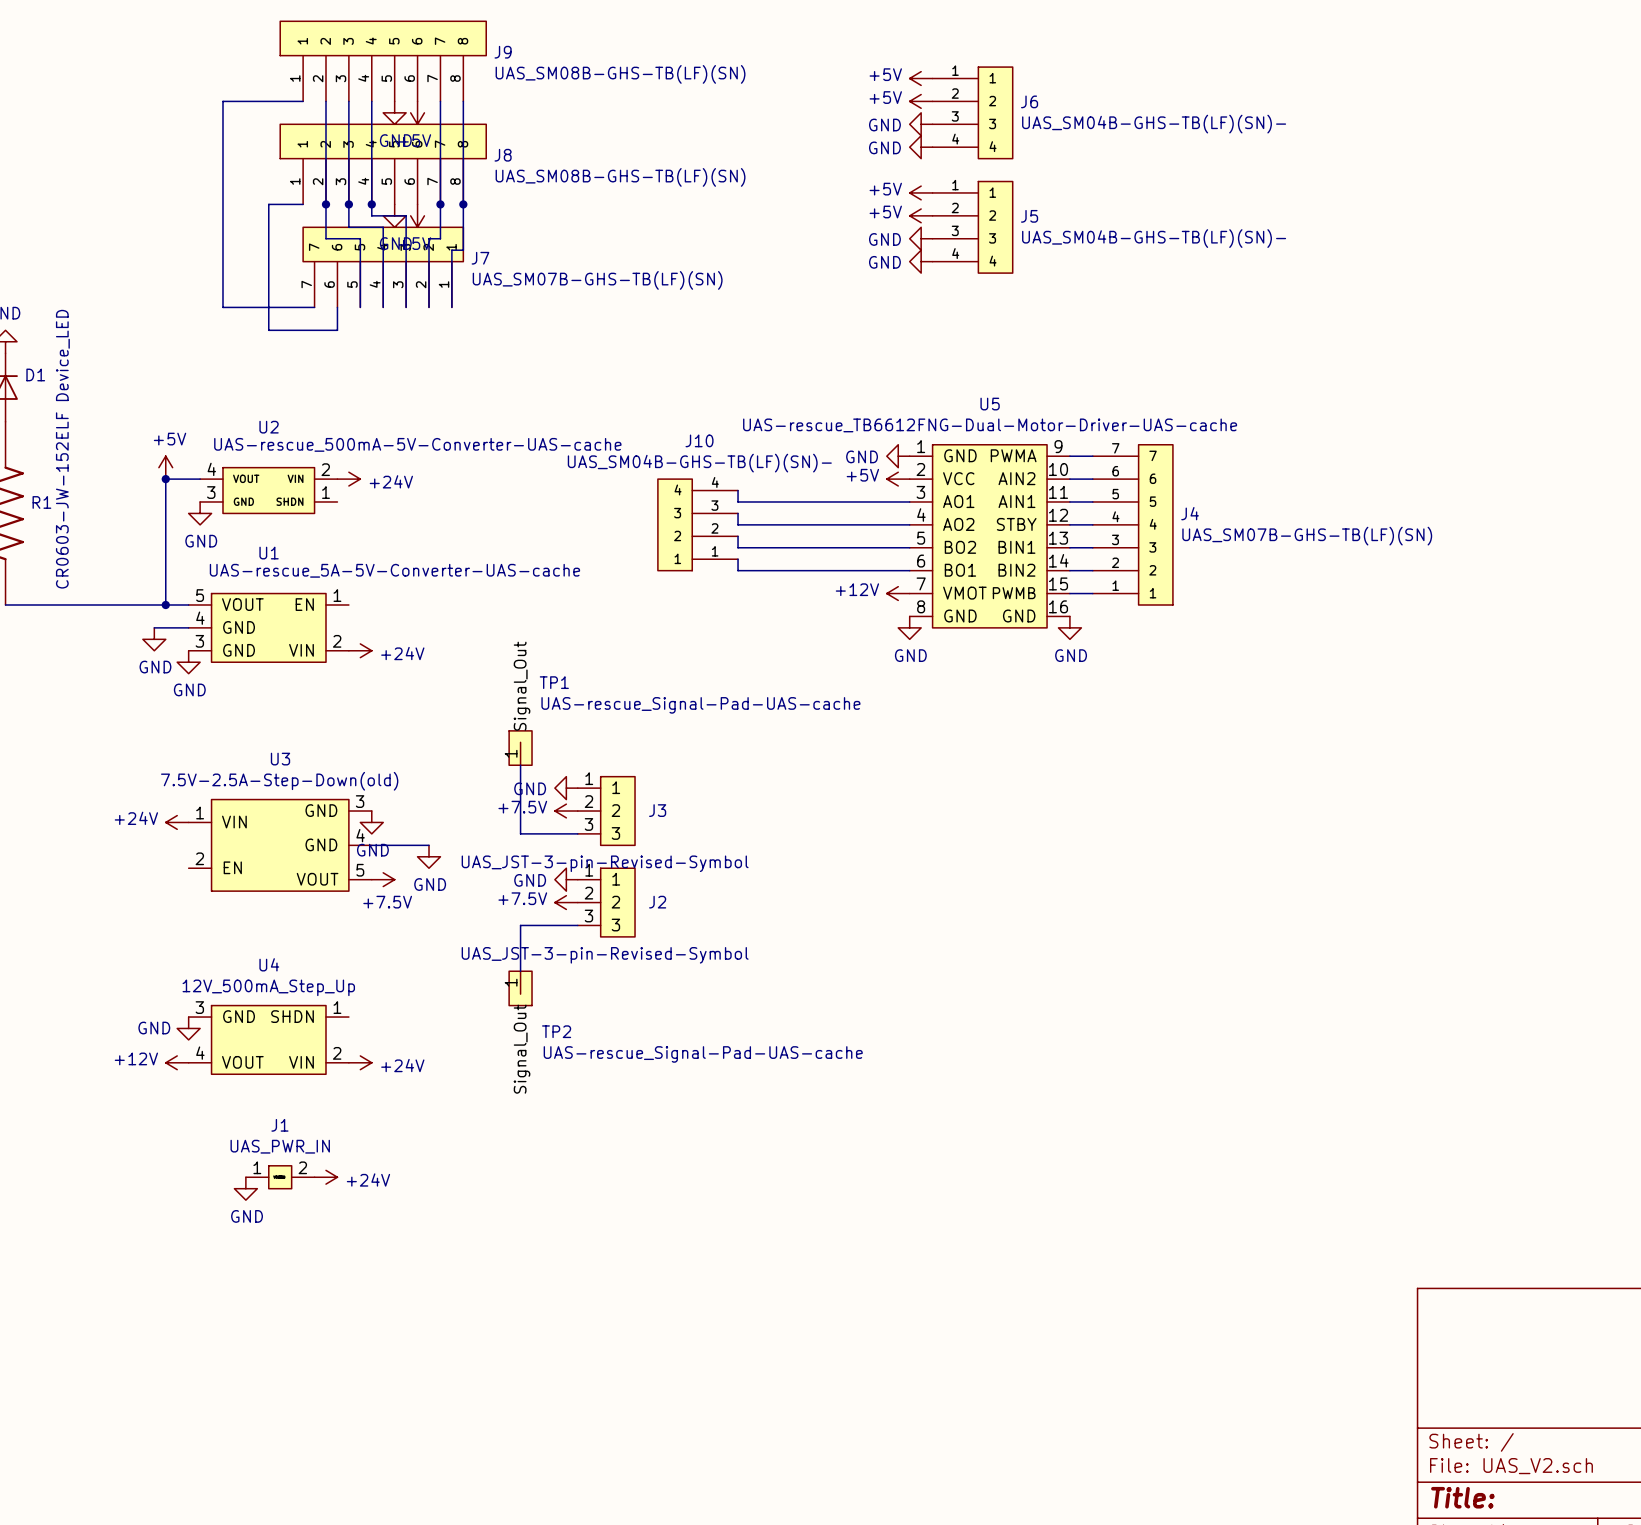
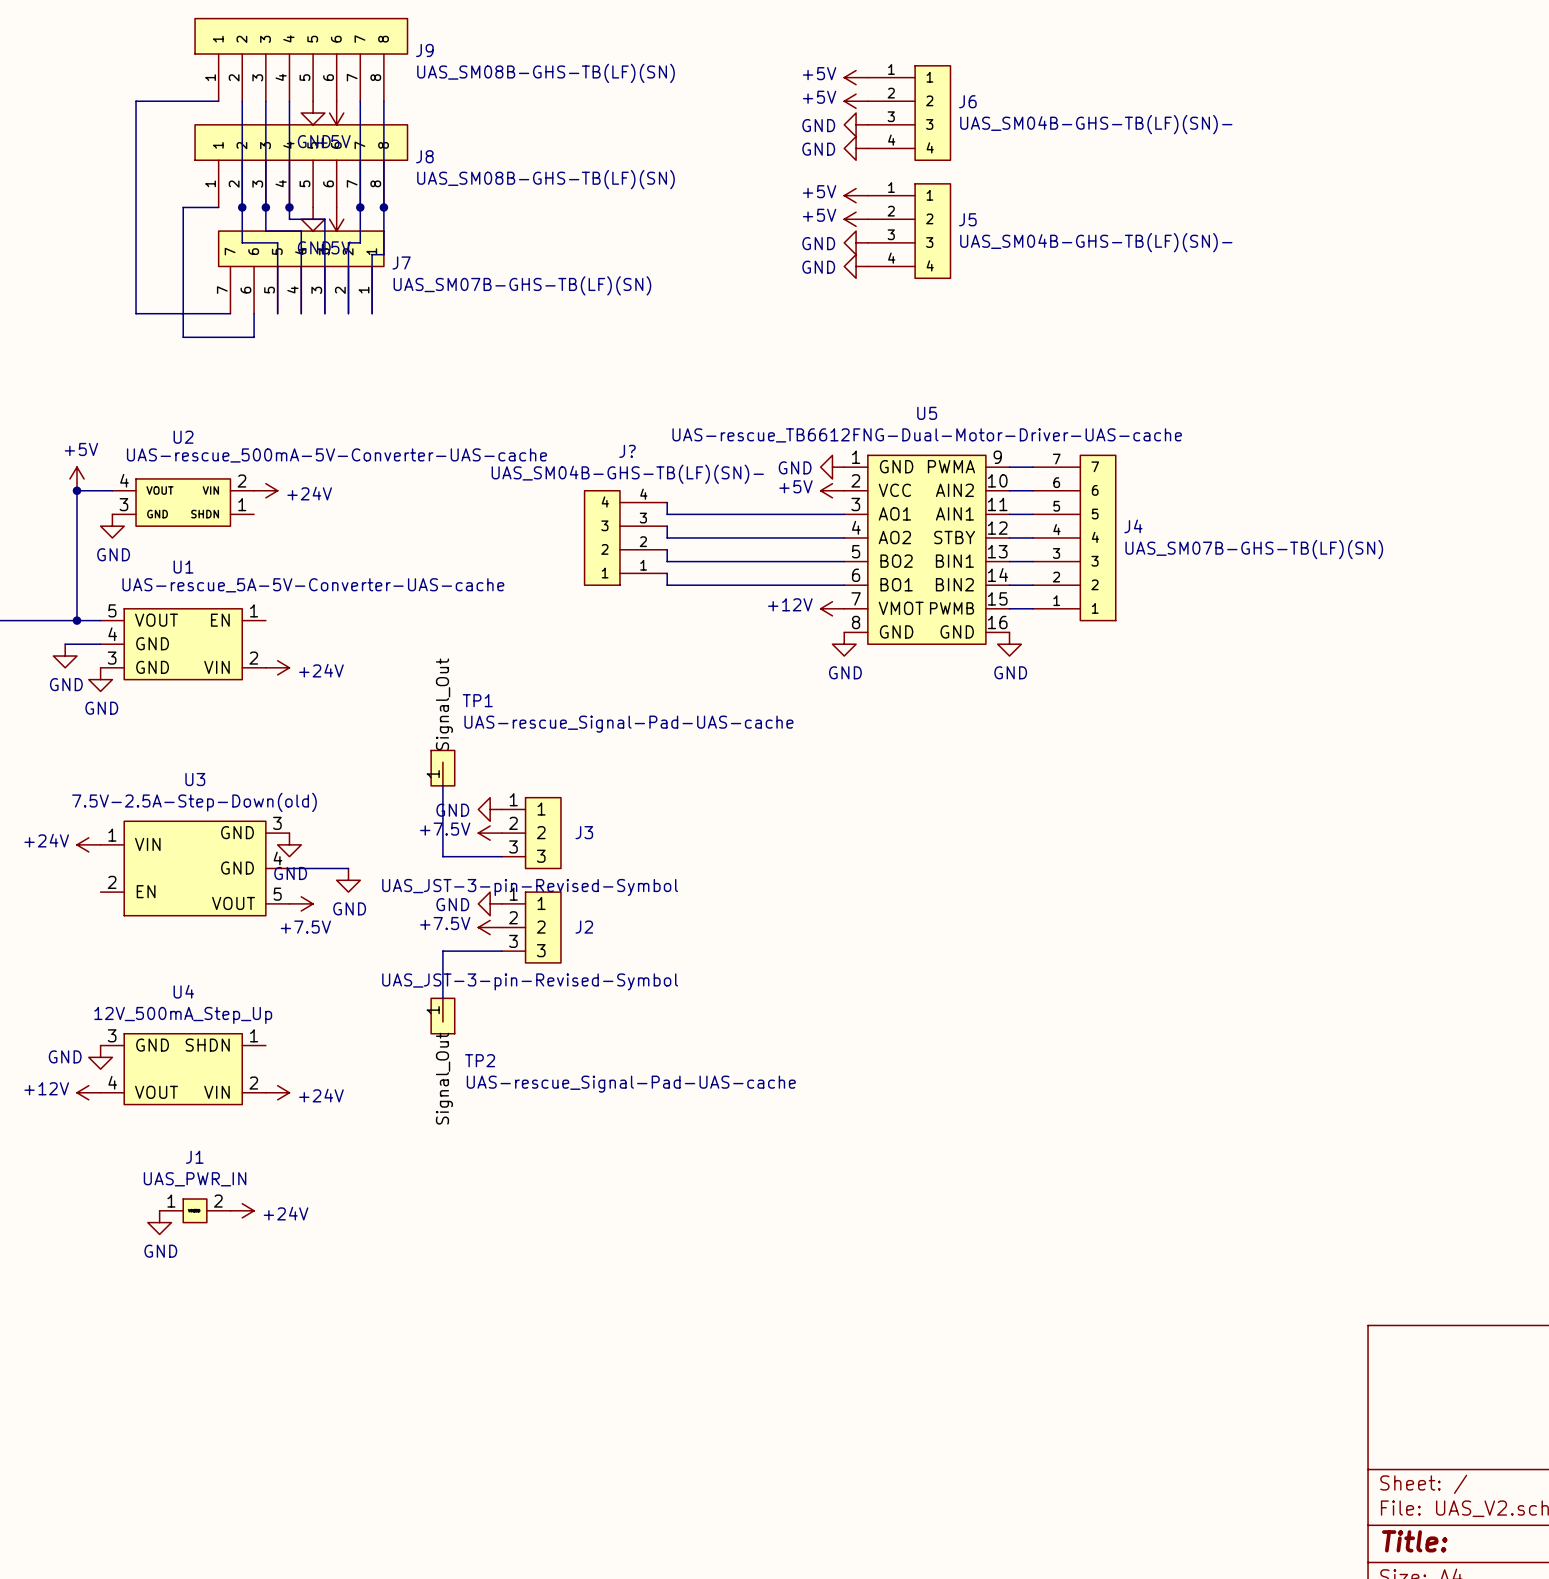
J10 name: J10 (699, 440) -> J? (627, 451)

